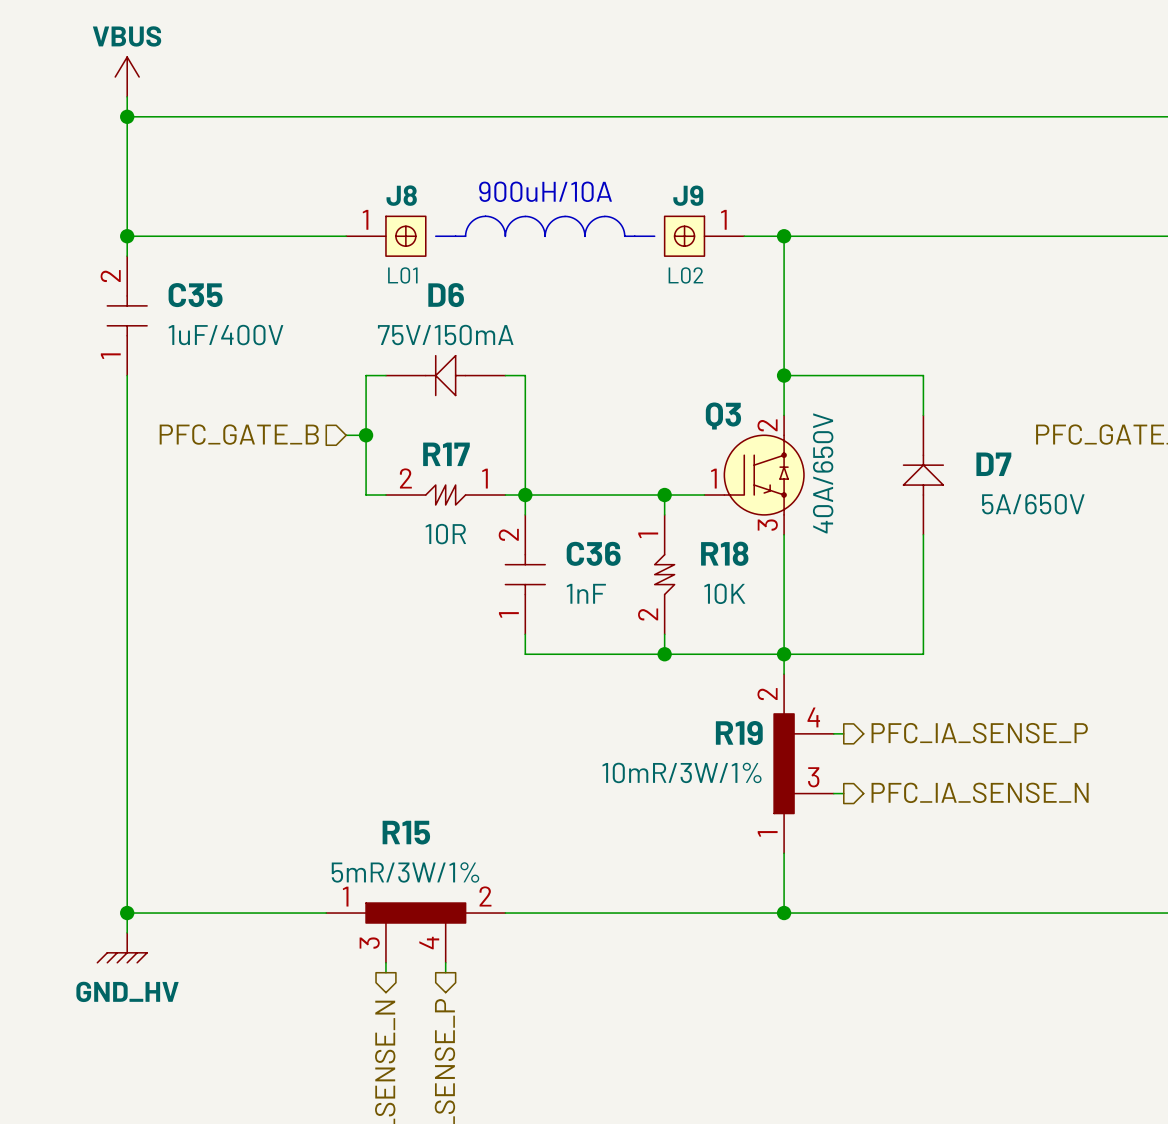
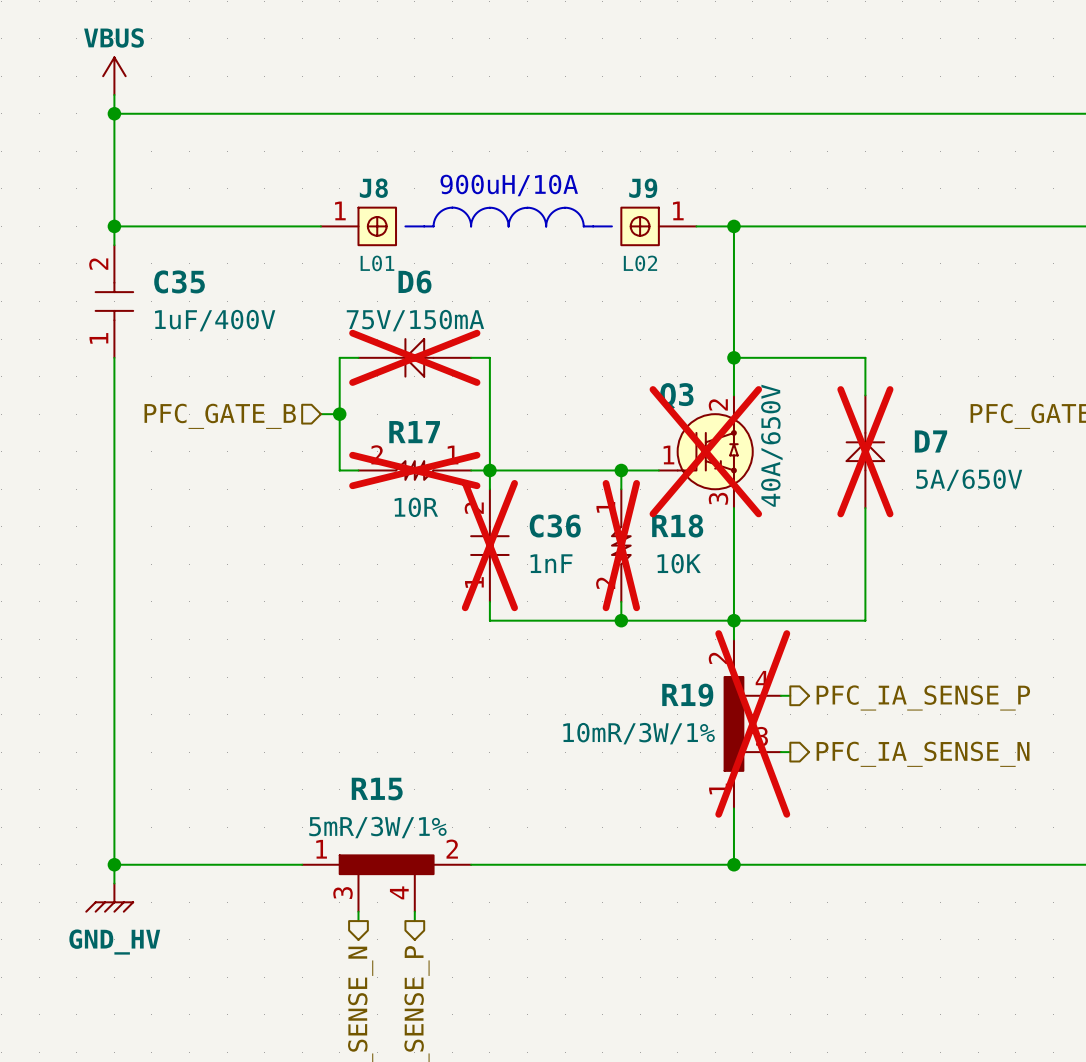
D6 do-not-place cross: none -> (414, 357)
Q3 do-not-place cross: none -> (705, 451)
D7 do-not-place cross: none -> (865, 451)
R17 do-not-place cross: none -> (414, 470)
C36 do-not-place cross: none -> (489, 545)
R18 do-not-place cross: none -> (621, 545)
R19 do-not-place cross: none -> (752, 723)

